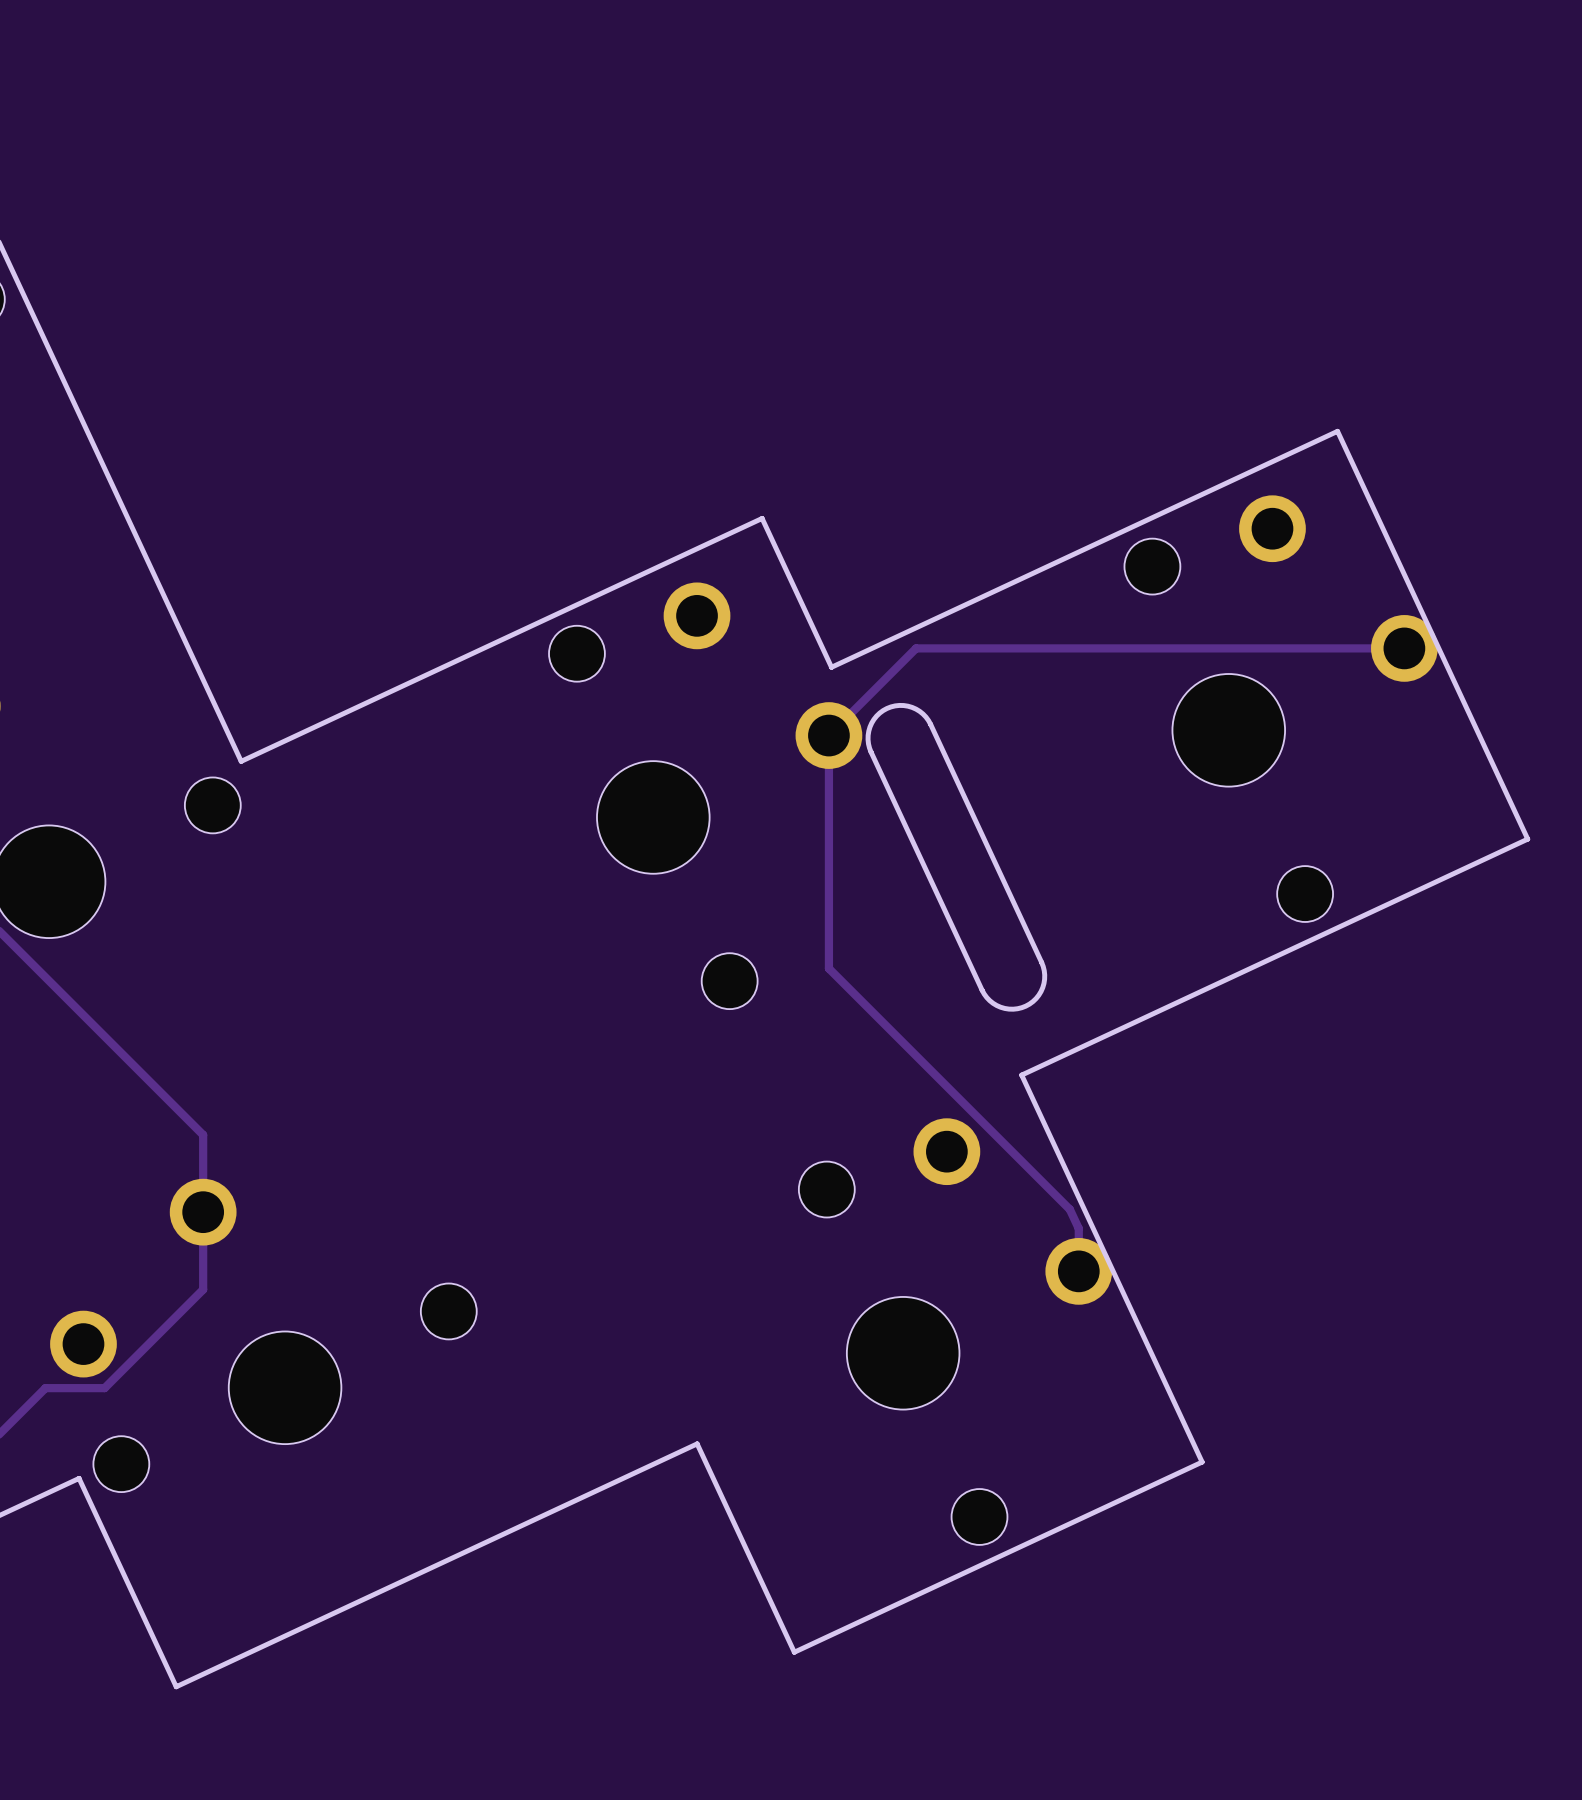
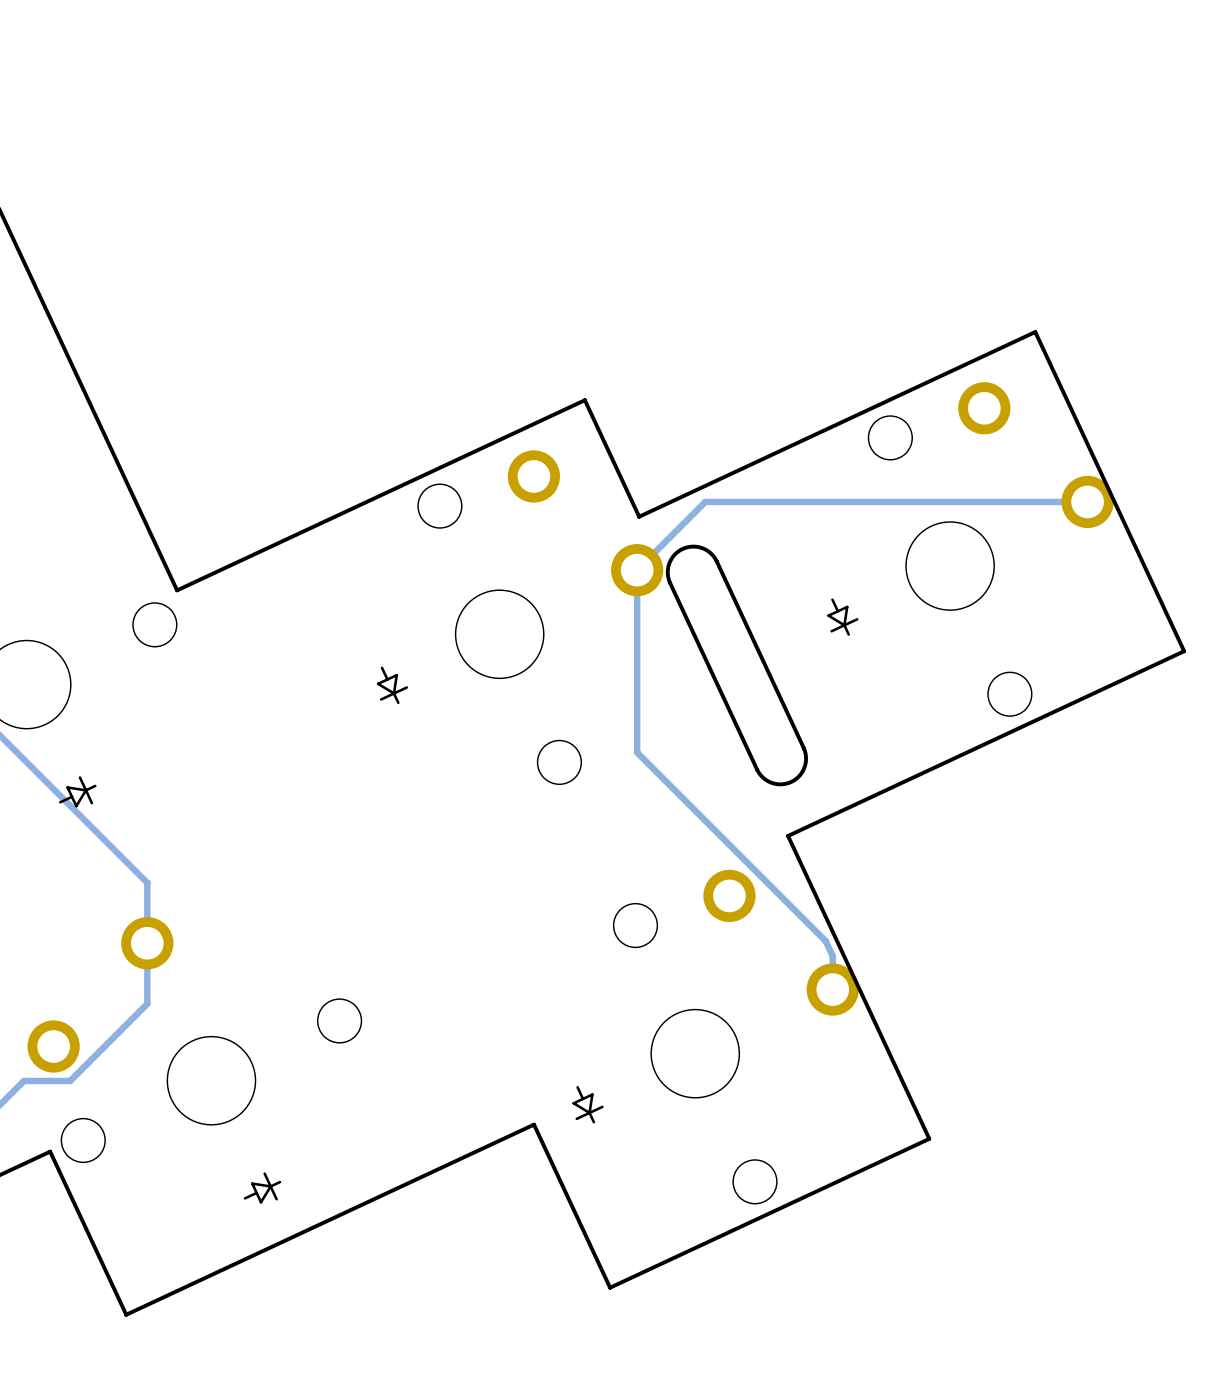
part: none -> (842, 617)
part: none -> (392, 685)
part: none -> (77, 791)
part: none -> (588, 1104)
part: none -> (262, 1187)

